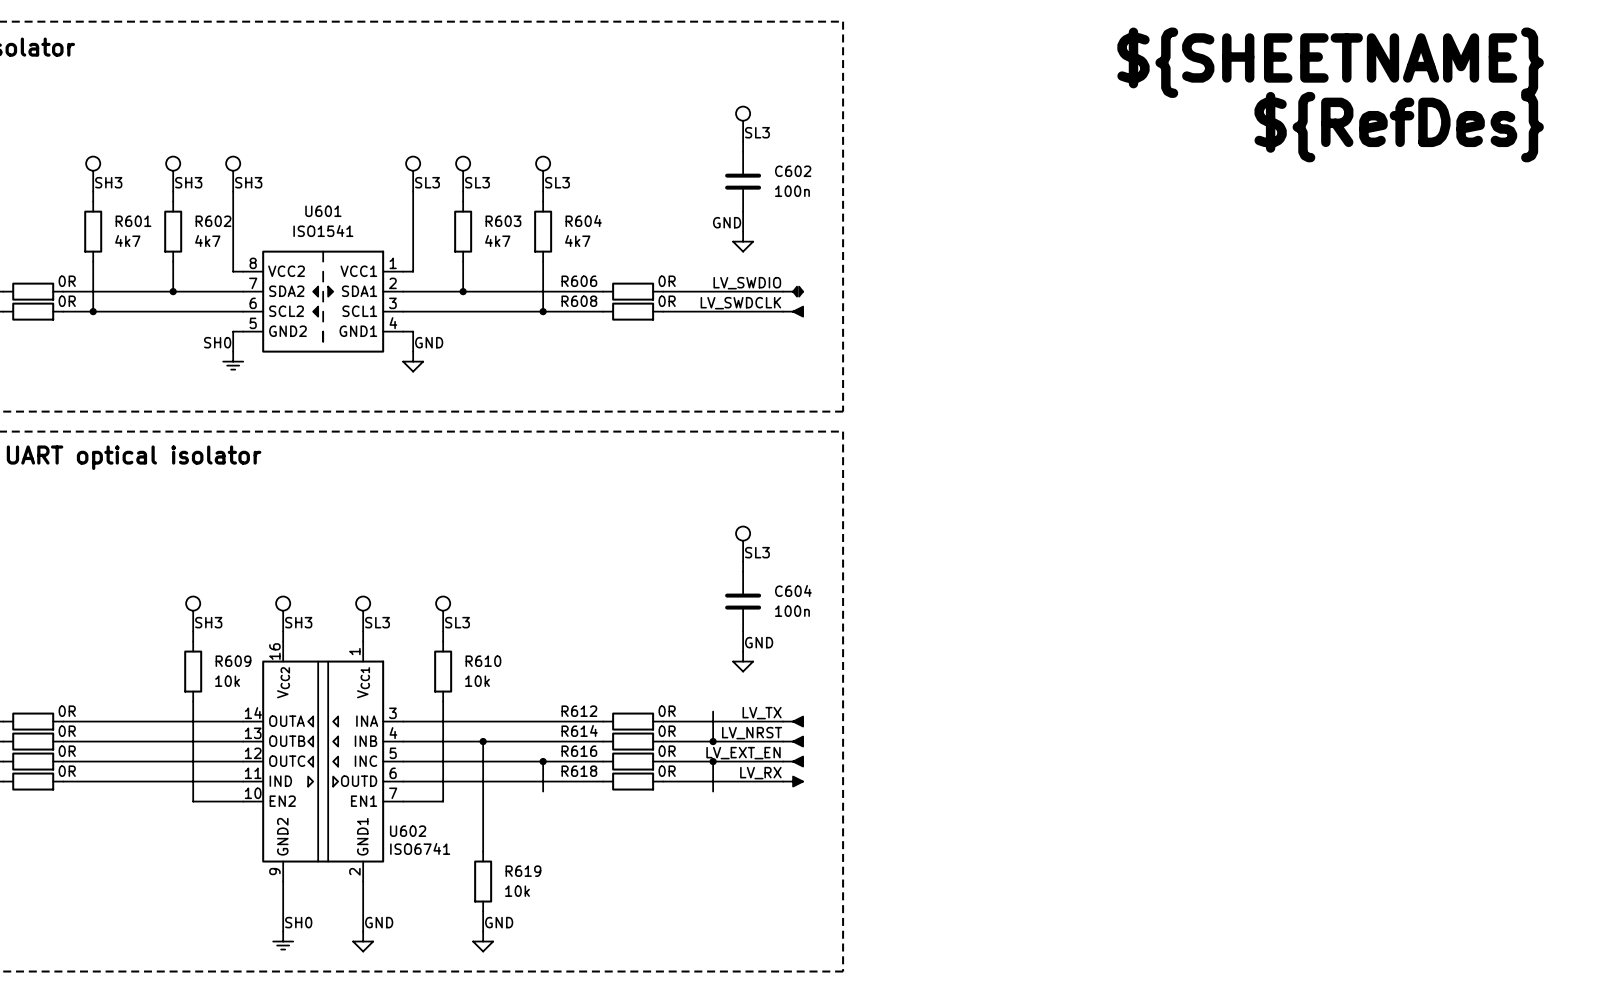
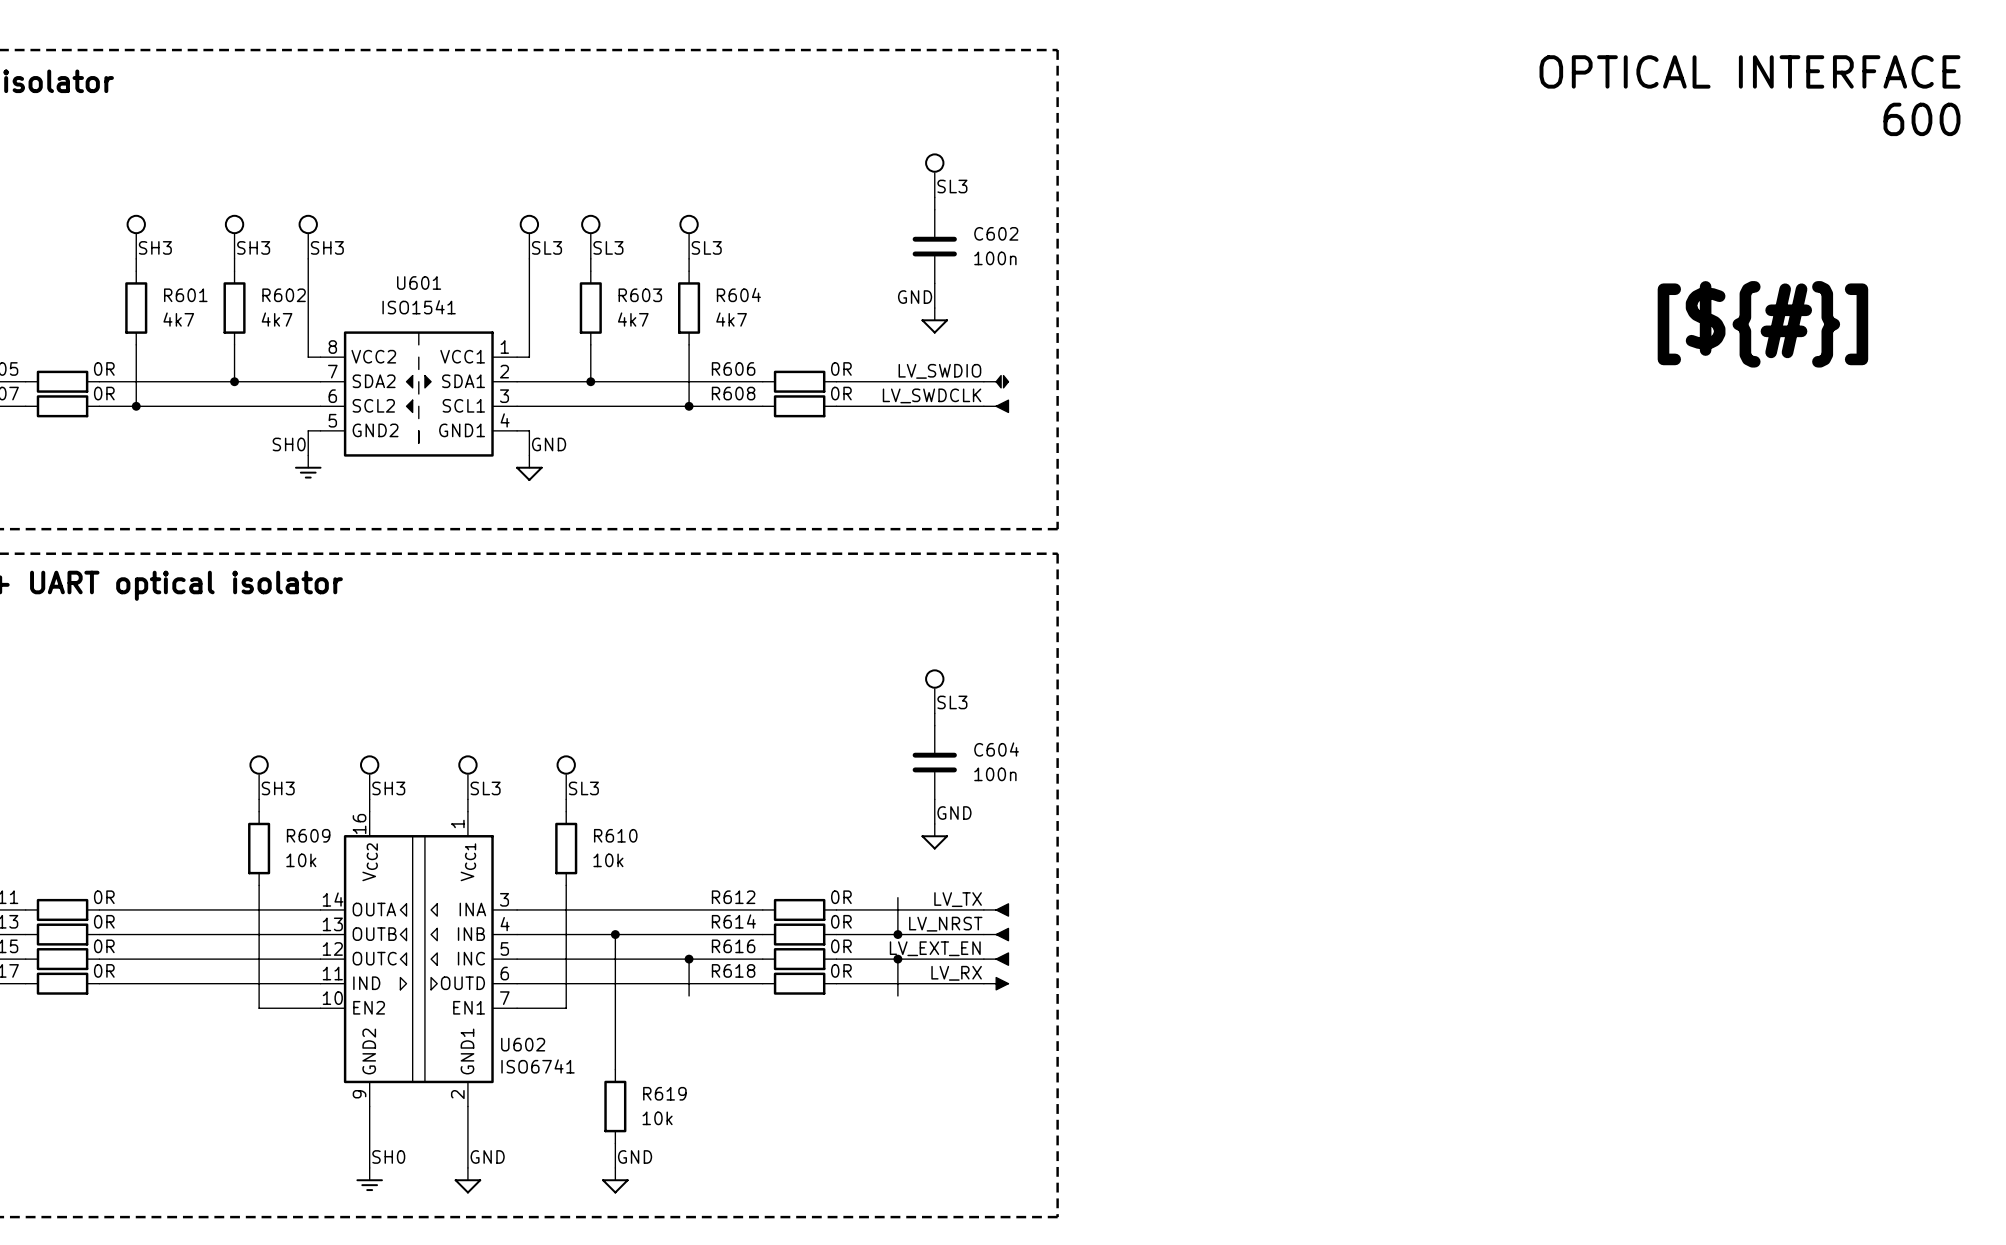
text: none -> OPTICAL INTERFACE (1749, 71)
text: ${SHEETNAME} (1330, 62) -> none
text: none -> 600 (1921, 119)
text: ${RefDes} (1399, 127) -> none
text: none -> [${#}] (1762, 324)

